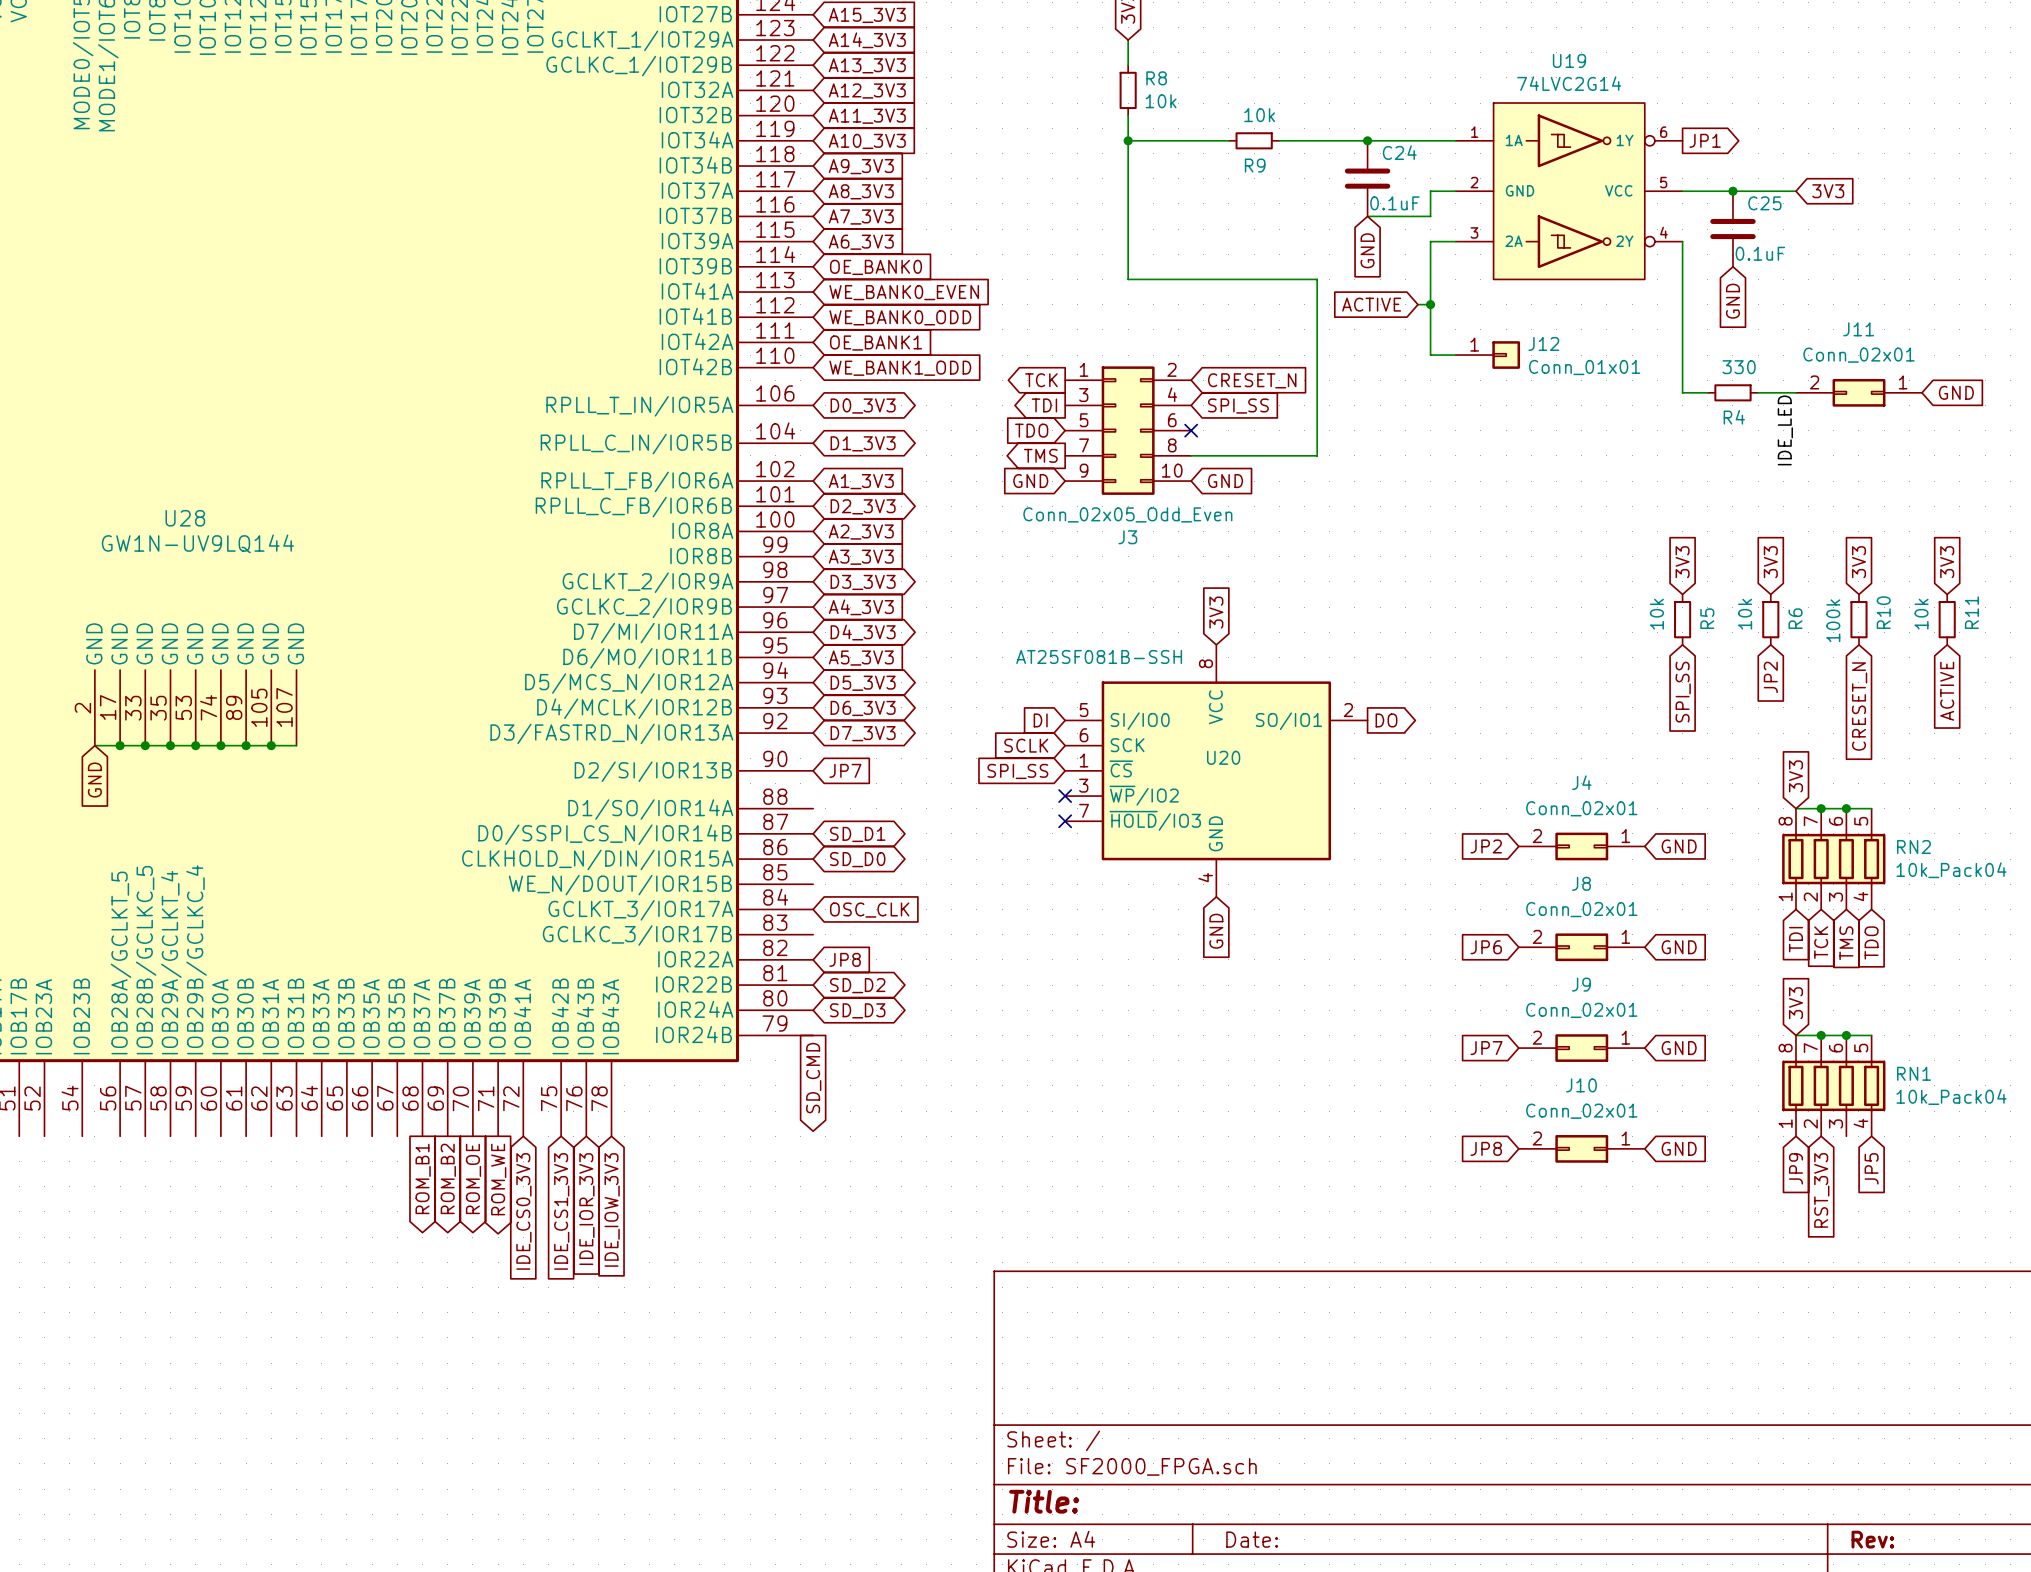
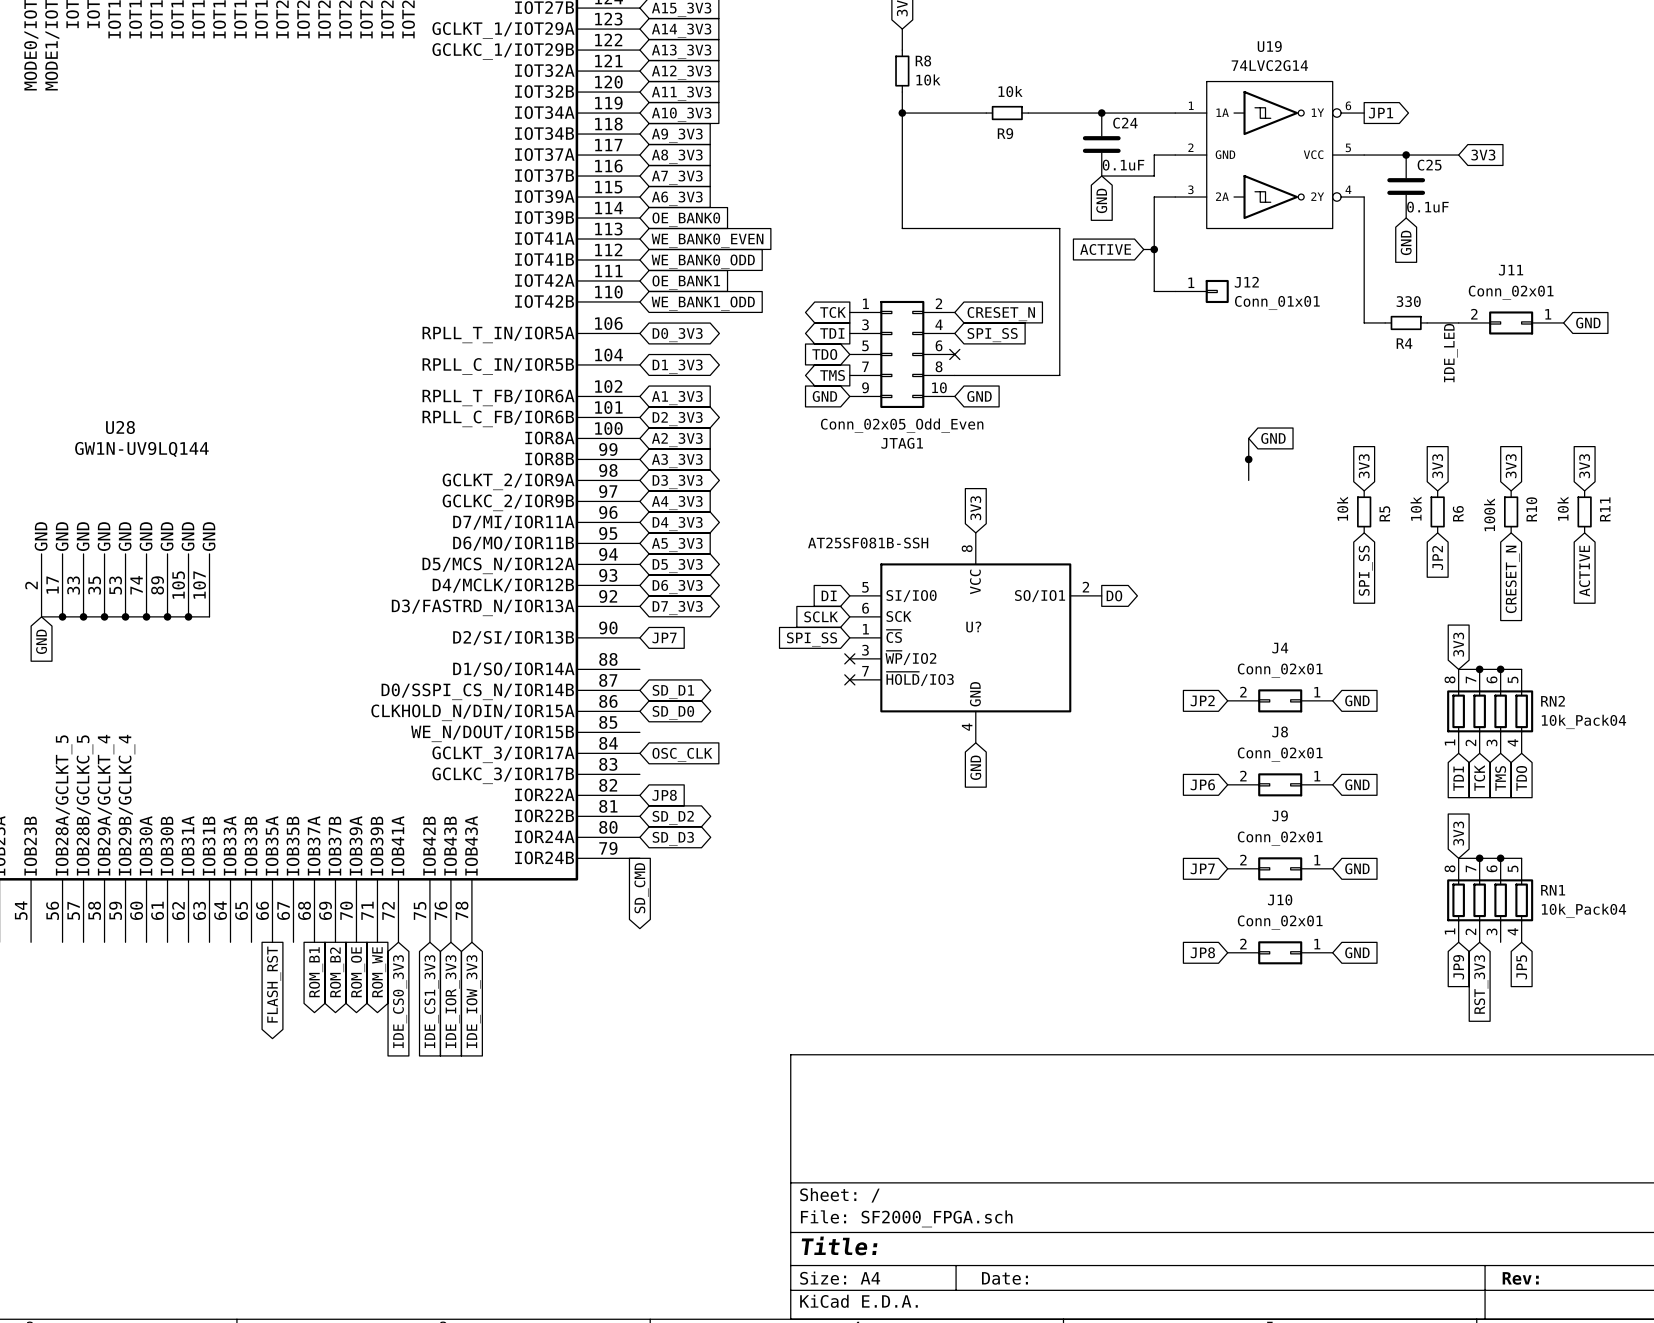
wire: none -> (1248, 438) (1248, 480)
global label: none -> GND (1273, 438)
J3 name: J3 (1127, 537) -> JTAG1 (902, 443)
junction: none -> (1248, 459)
U20 name: U20 (1223, 757) -> U? (973, 627)
global label: none -> FLASH_RST (274, 984)

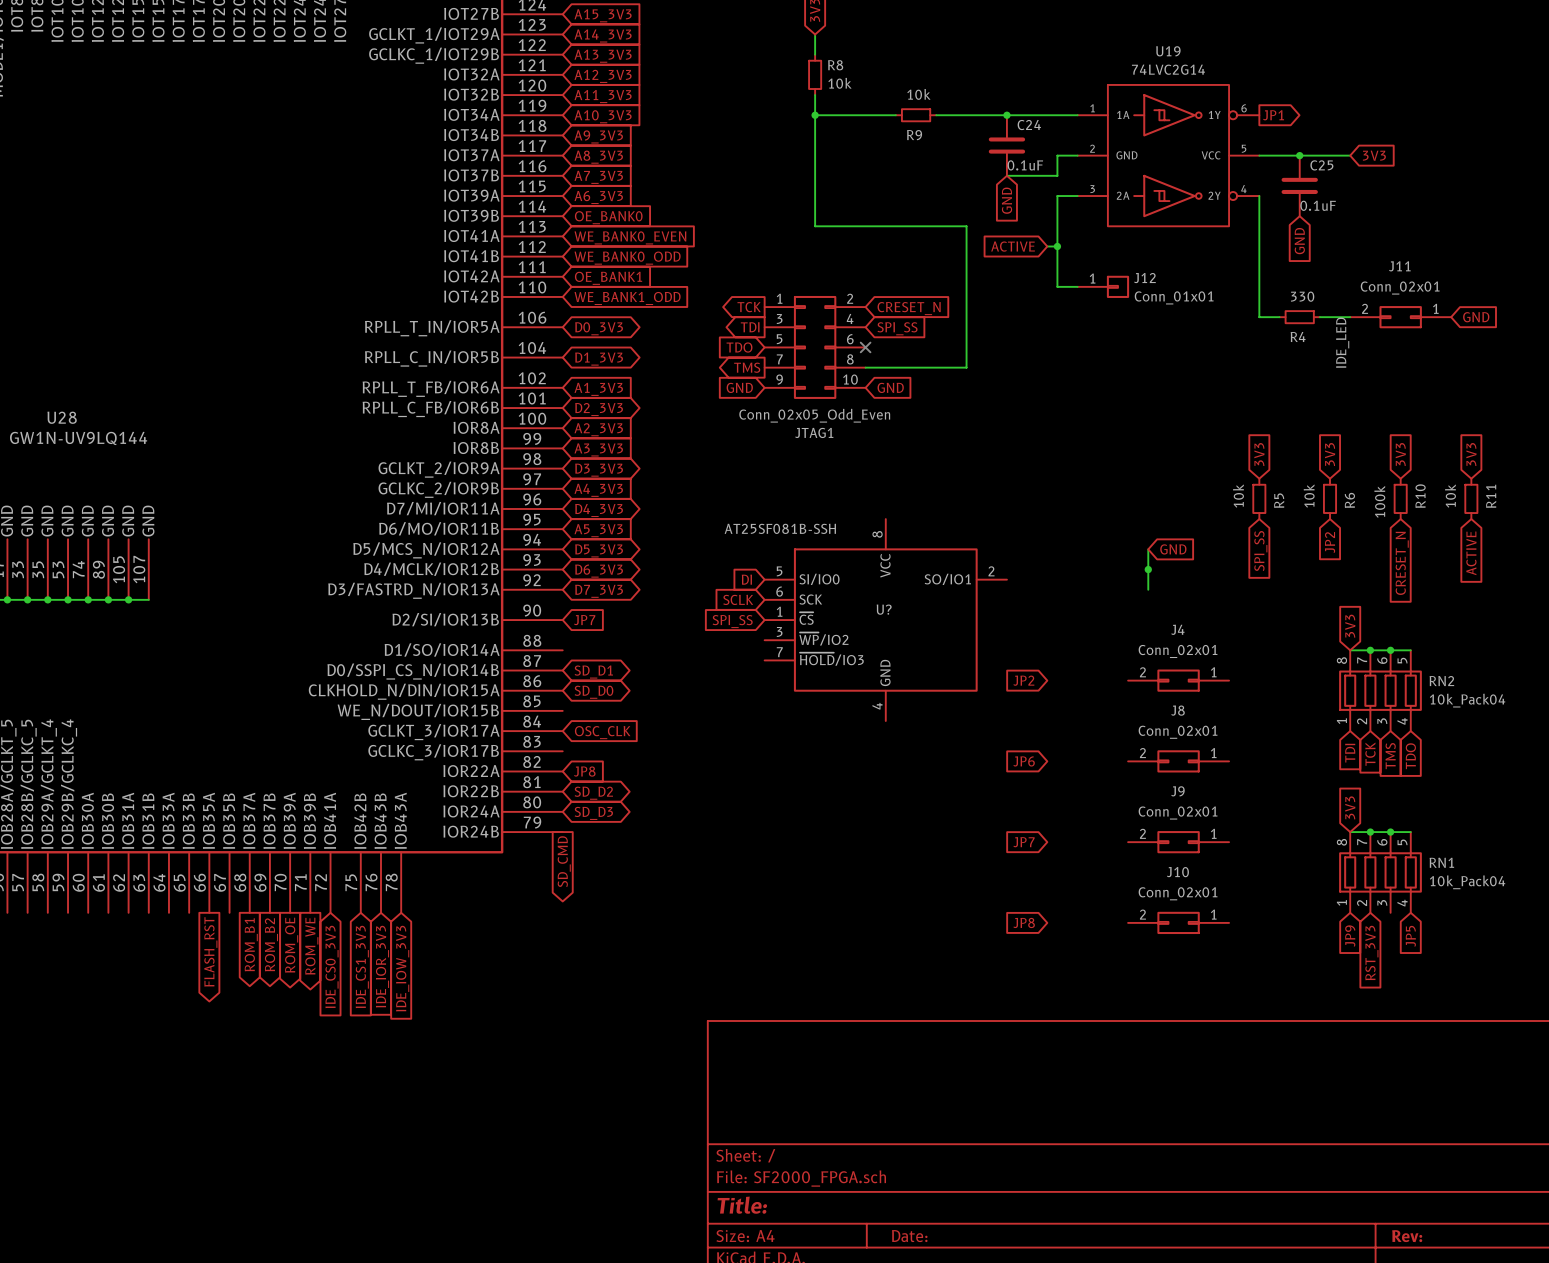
wire: (1248, 438) (1248, 480) -> (1148, 549) (1148, 589)
global label: GND (1273, 438) -> none
junction: (1248, 459) -> none
global label: 3V3 (975, 508) -> none
global label: none -> GND (1173, 549)
junction: none -> (1148, 569)
global label: DO (1114, 595) -> none
no-connect mark: (849, 658) -> none
no-connect mark: (849, 679) -> none
global label position: JP2 (1202, 700) -> JP2 (1023, 680)
global label: GND (1357, 700) -> none
global label: GND (975, 767) -> none
global label position: JP6 (1202, 784) -> JP6 (1024, 761)
global label: GND (1357, 784) -> none
global label position: JP7 (1202, 868) -> JP7 (1024, 842)
global label: GND (1357, 868) -> none
global label position: JP8 (1202, 952) -> JP8 (1024, 922)
global label: GND (1357, 952) -> none

